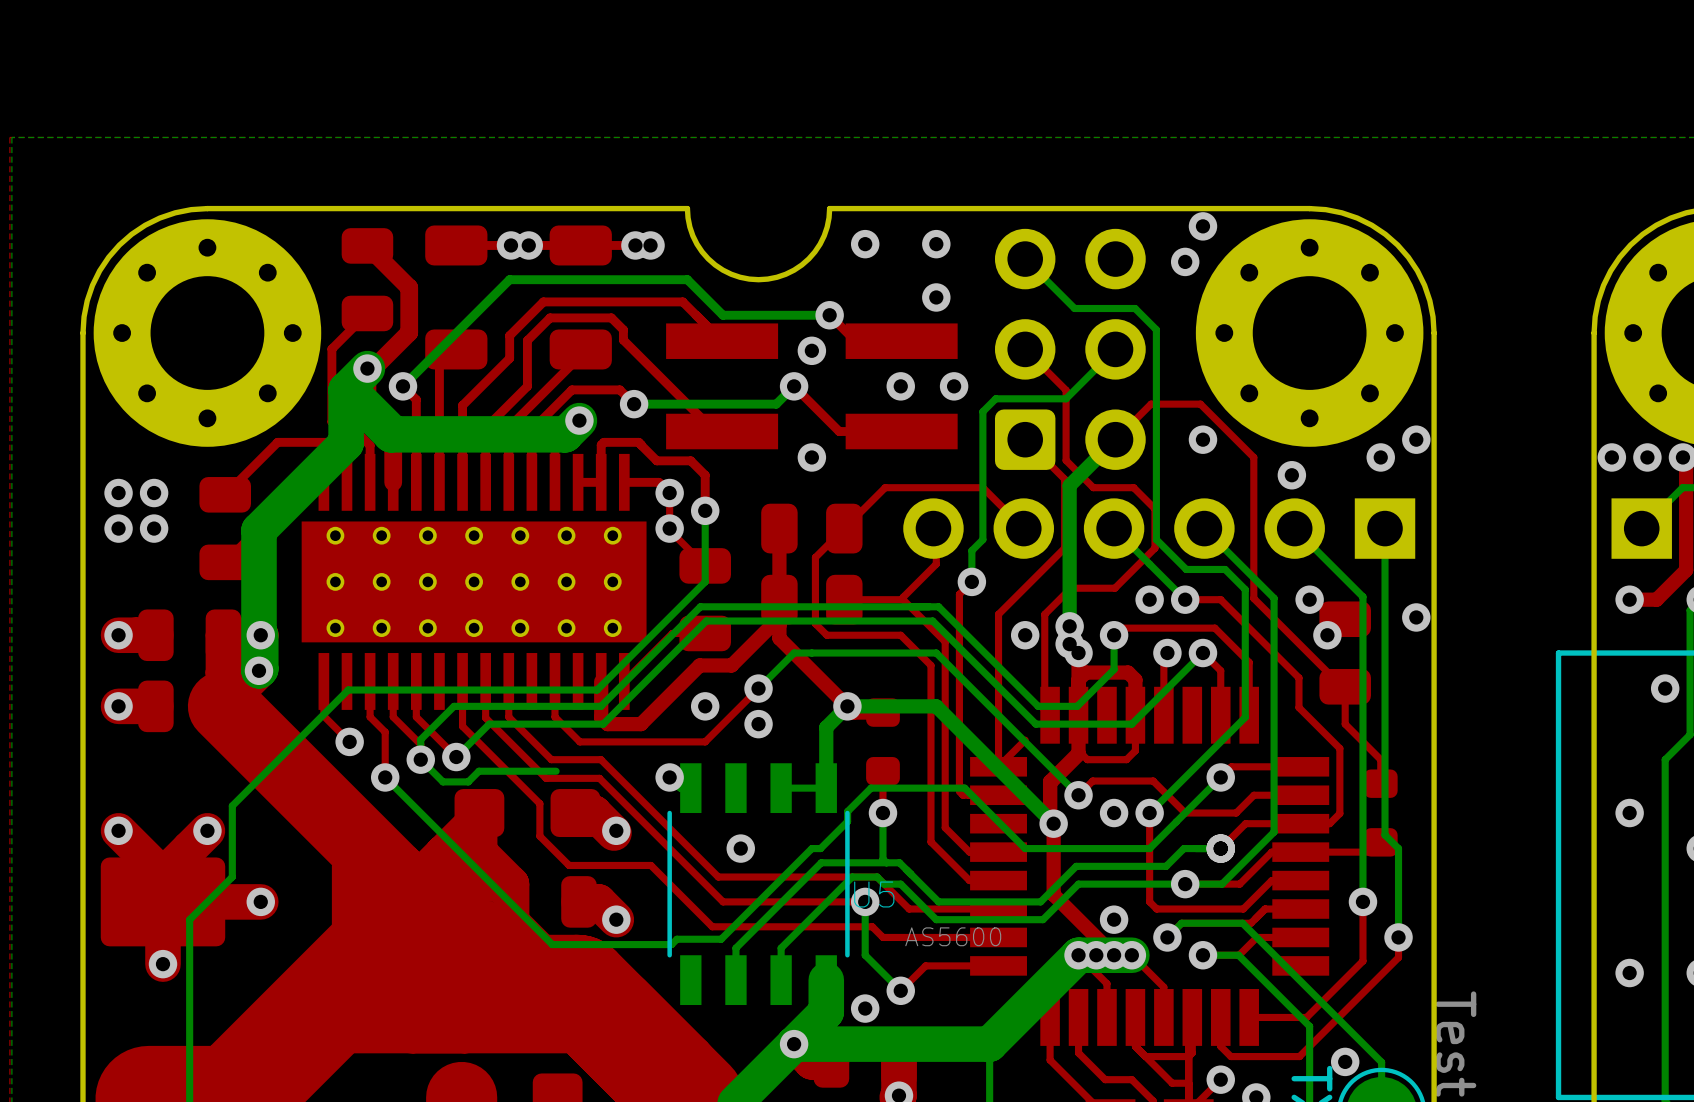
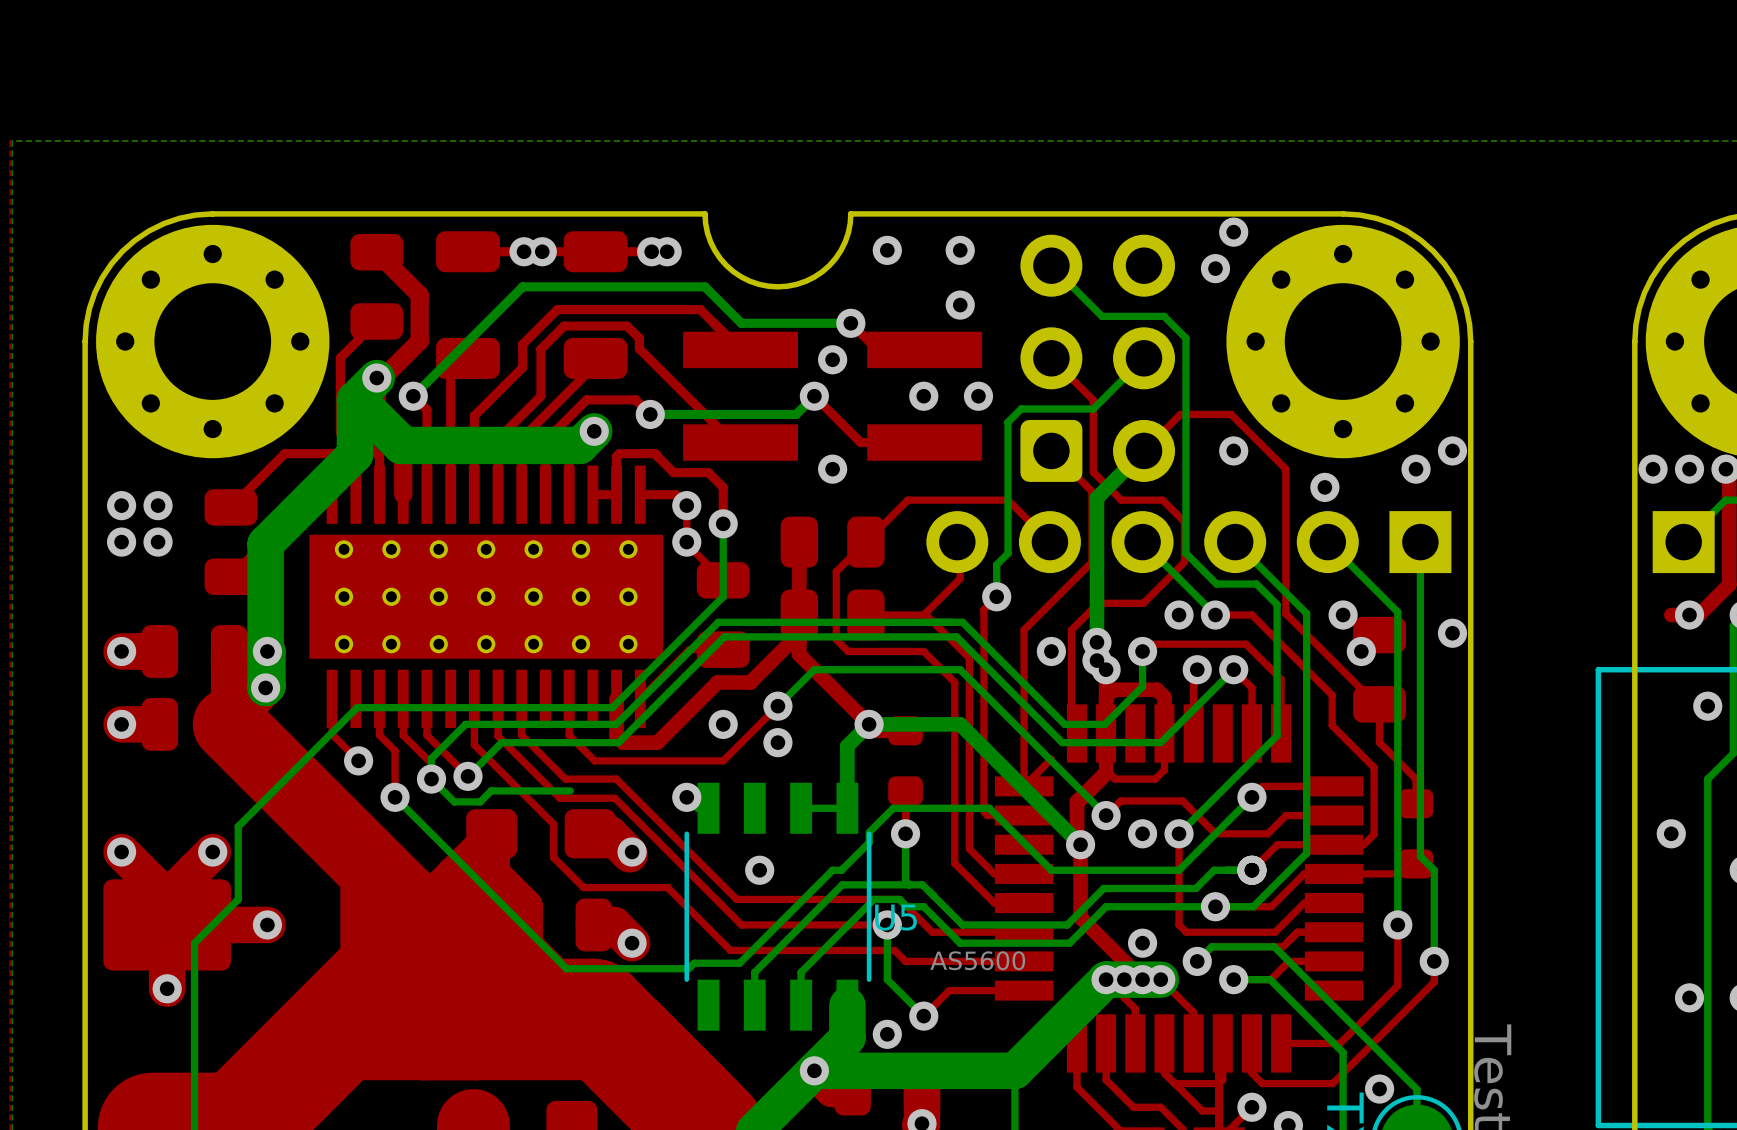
via position: (1629, 599) -> (1689, 615)
via position: (1629, 973) -> (1689, 997)

